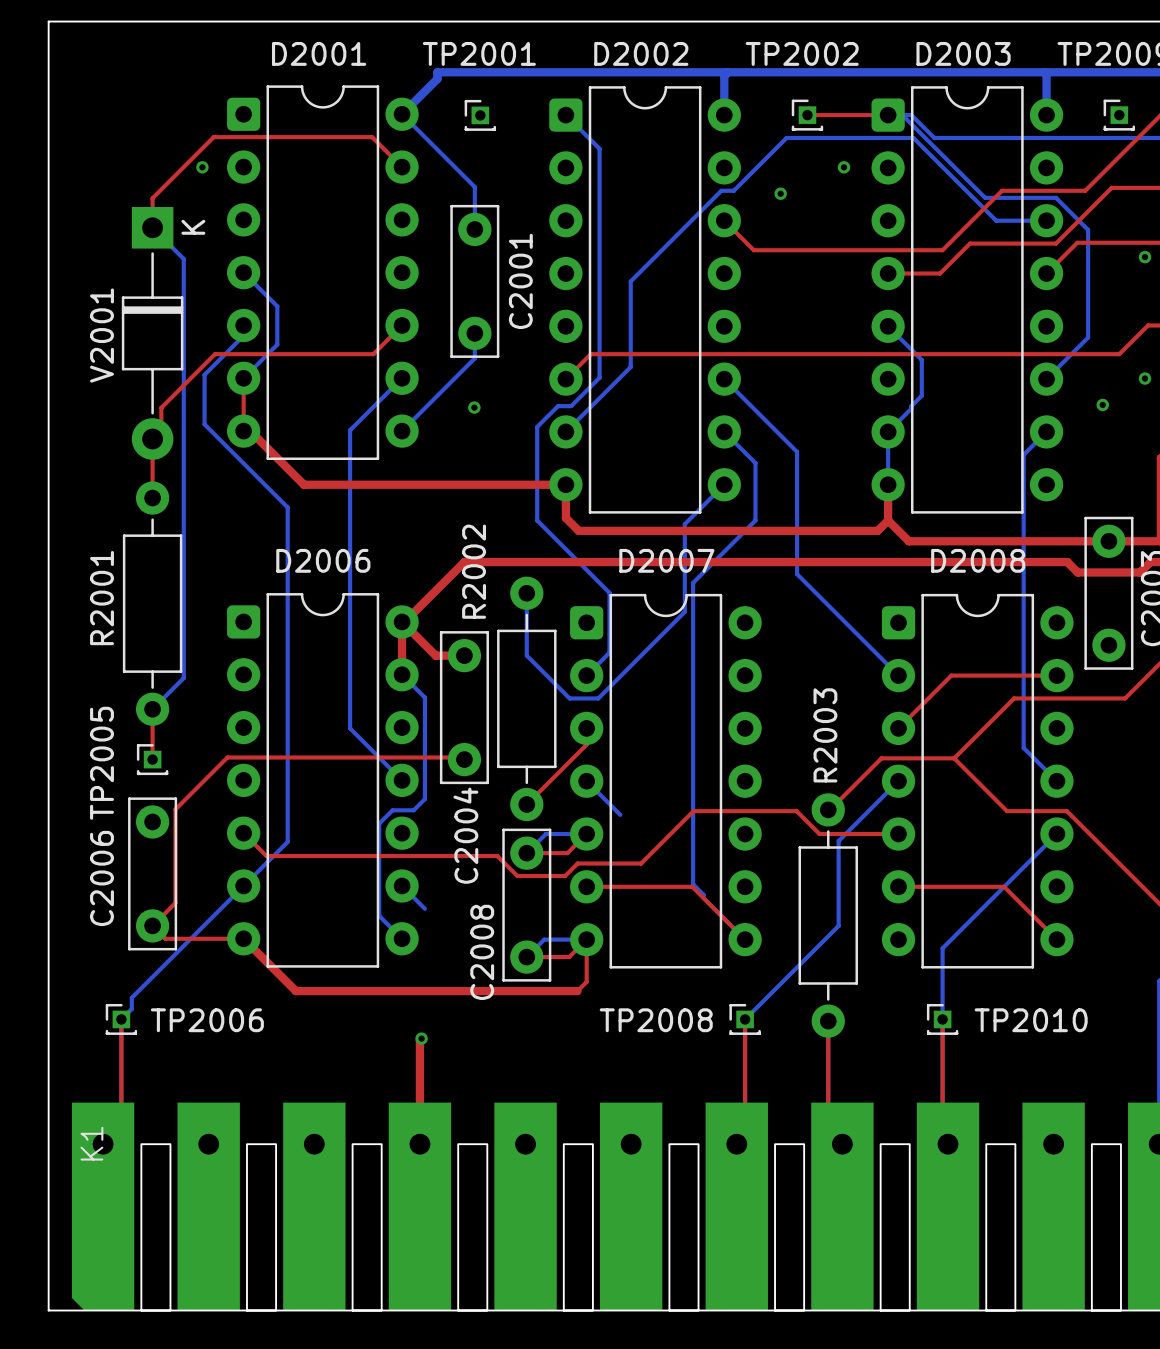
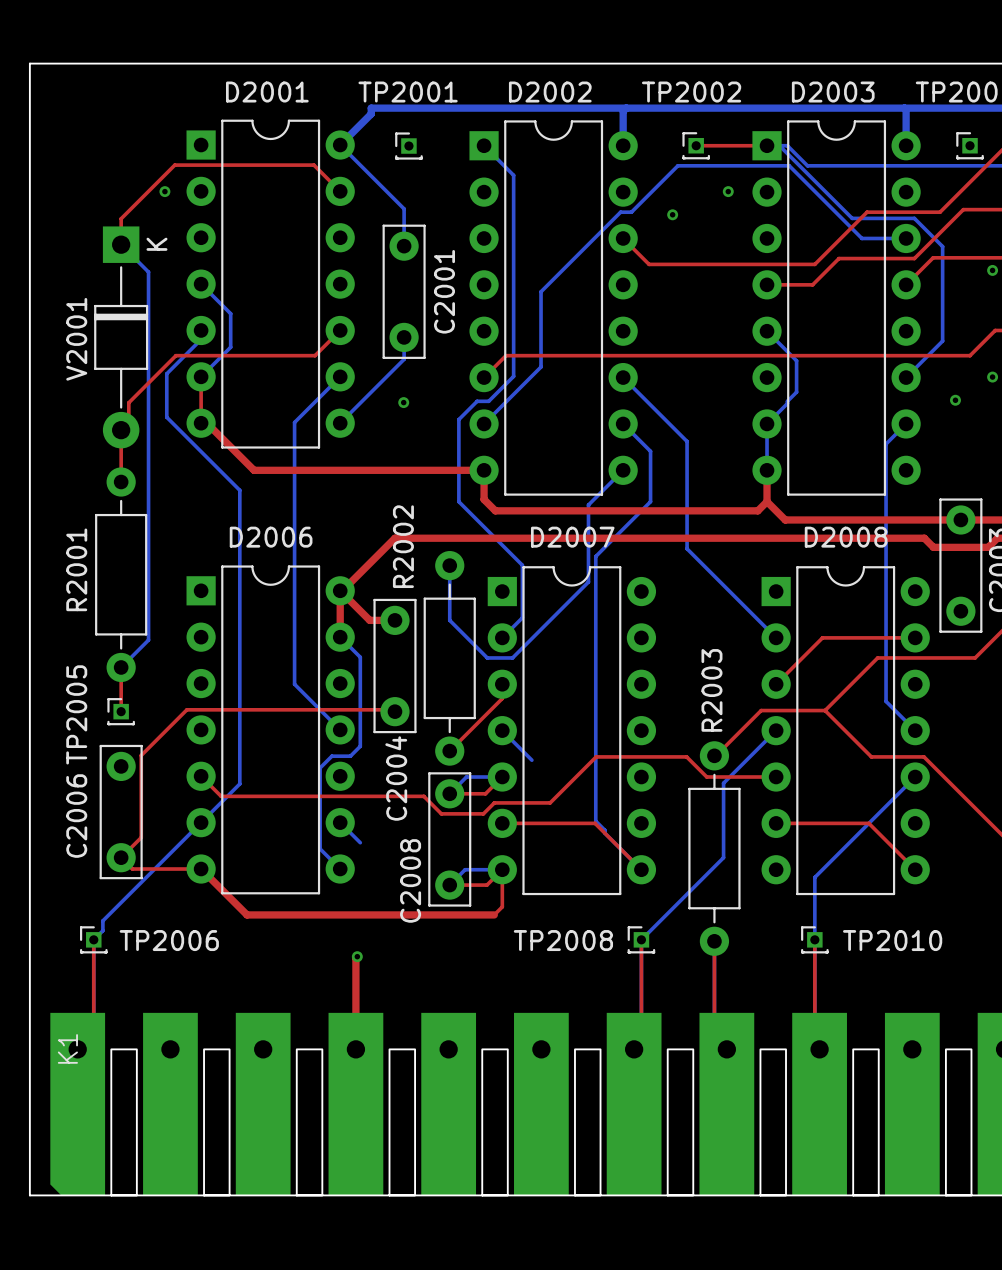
D2001 footprint: [227, 85, 419, 461] -> [186, 119, 355, 449]
D2002 footprint: [549, 86, 741, 514] -> [469, 120, 638, 496]
D2003 footprint: [871, 86, 1064, 514] -> [752, 120, 921, 496]
D2006 footprint: [227, 593, 419, 968] -> [186, 565, 355, 895]
D2007 footprint: [570, 593, 762, 969] -> [487, 566, 657, 896]
D2008 footprint: [881, 593, 1074, 969] -> [761, 566, 930, 896]

